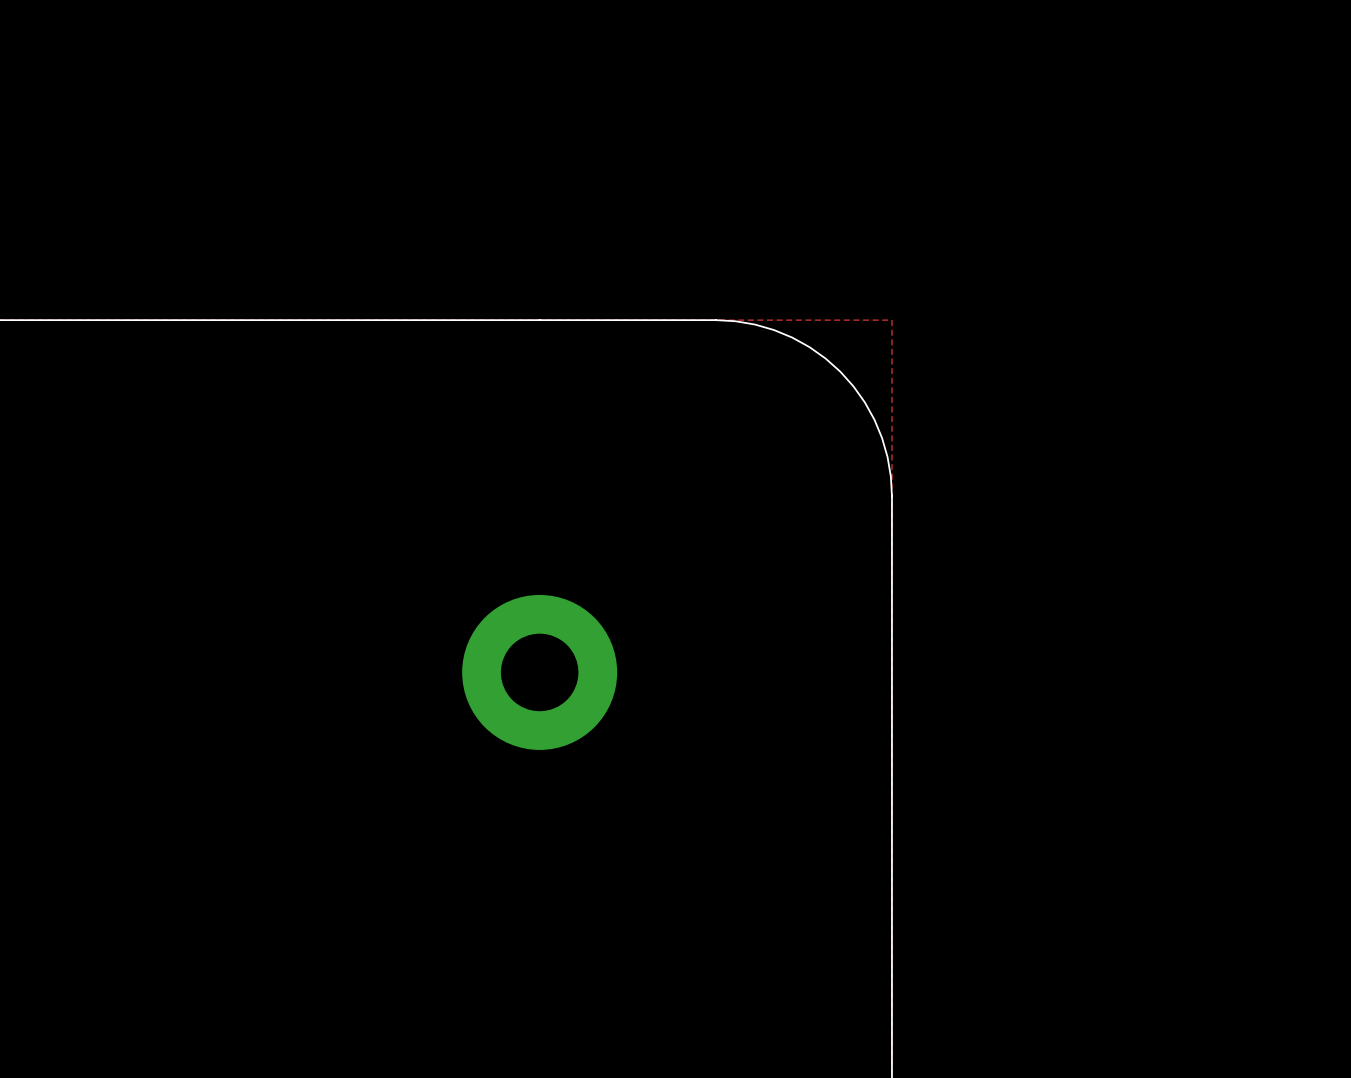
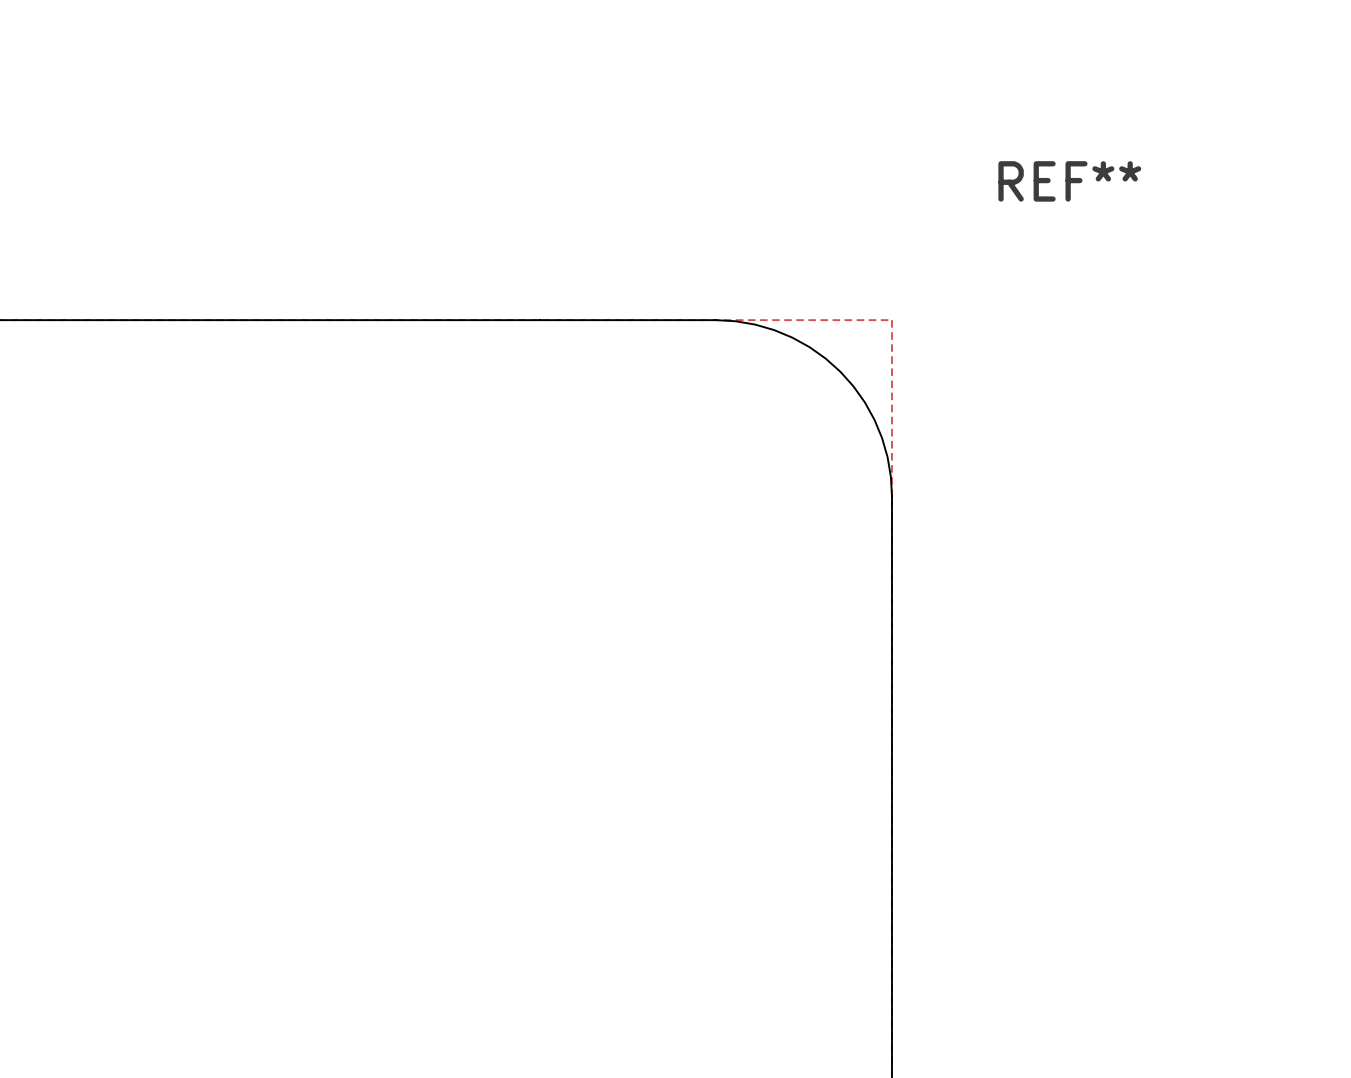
REF**: none -> (1069, 181)
part: (539, 672) -> none

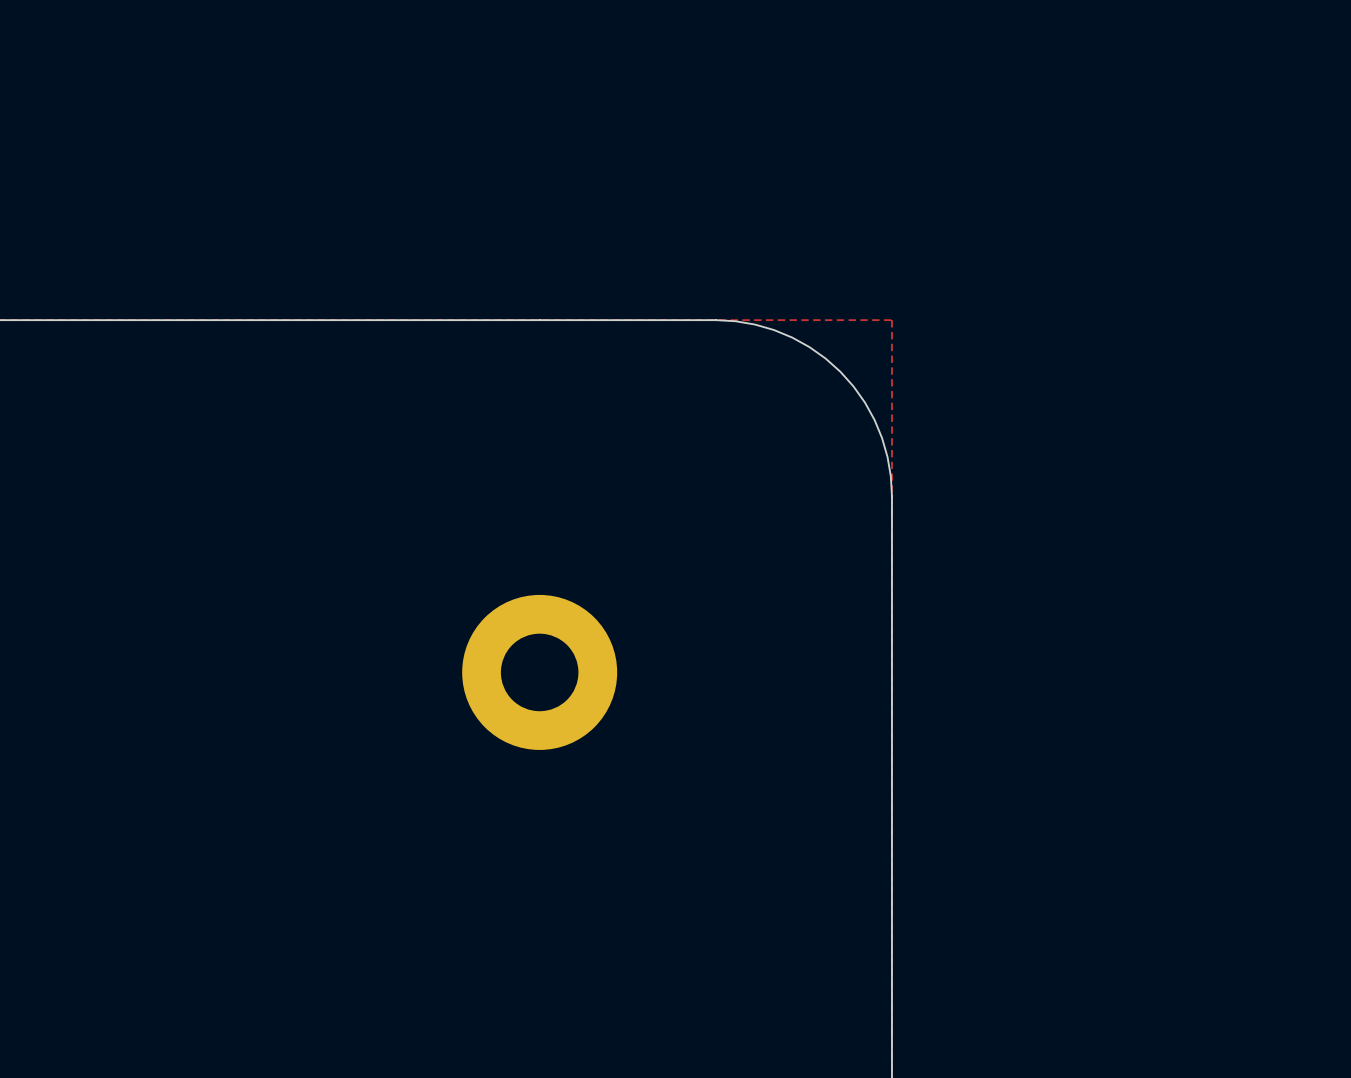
REF**: (1069, 181) -> none
part: none -> (539, 672)

